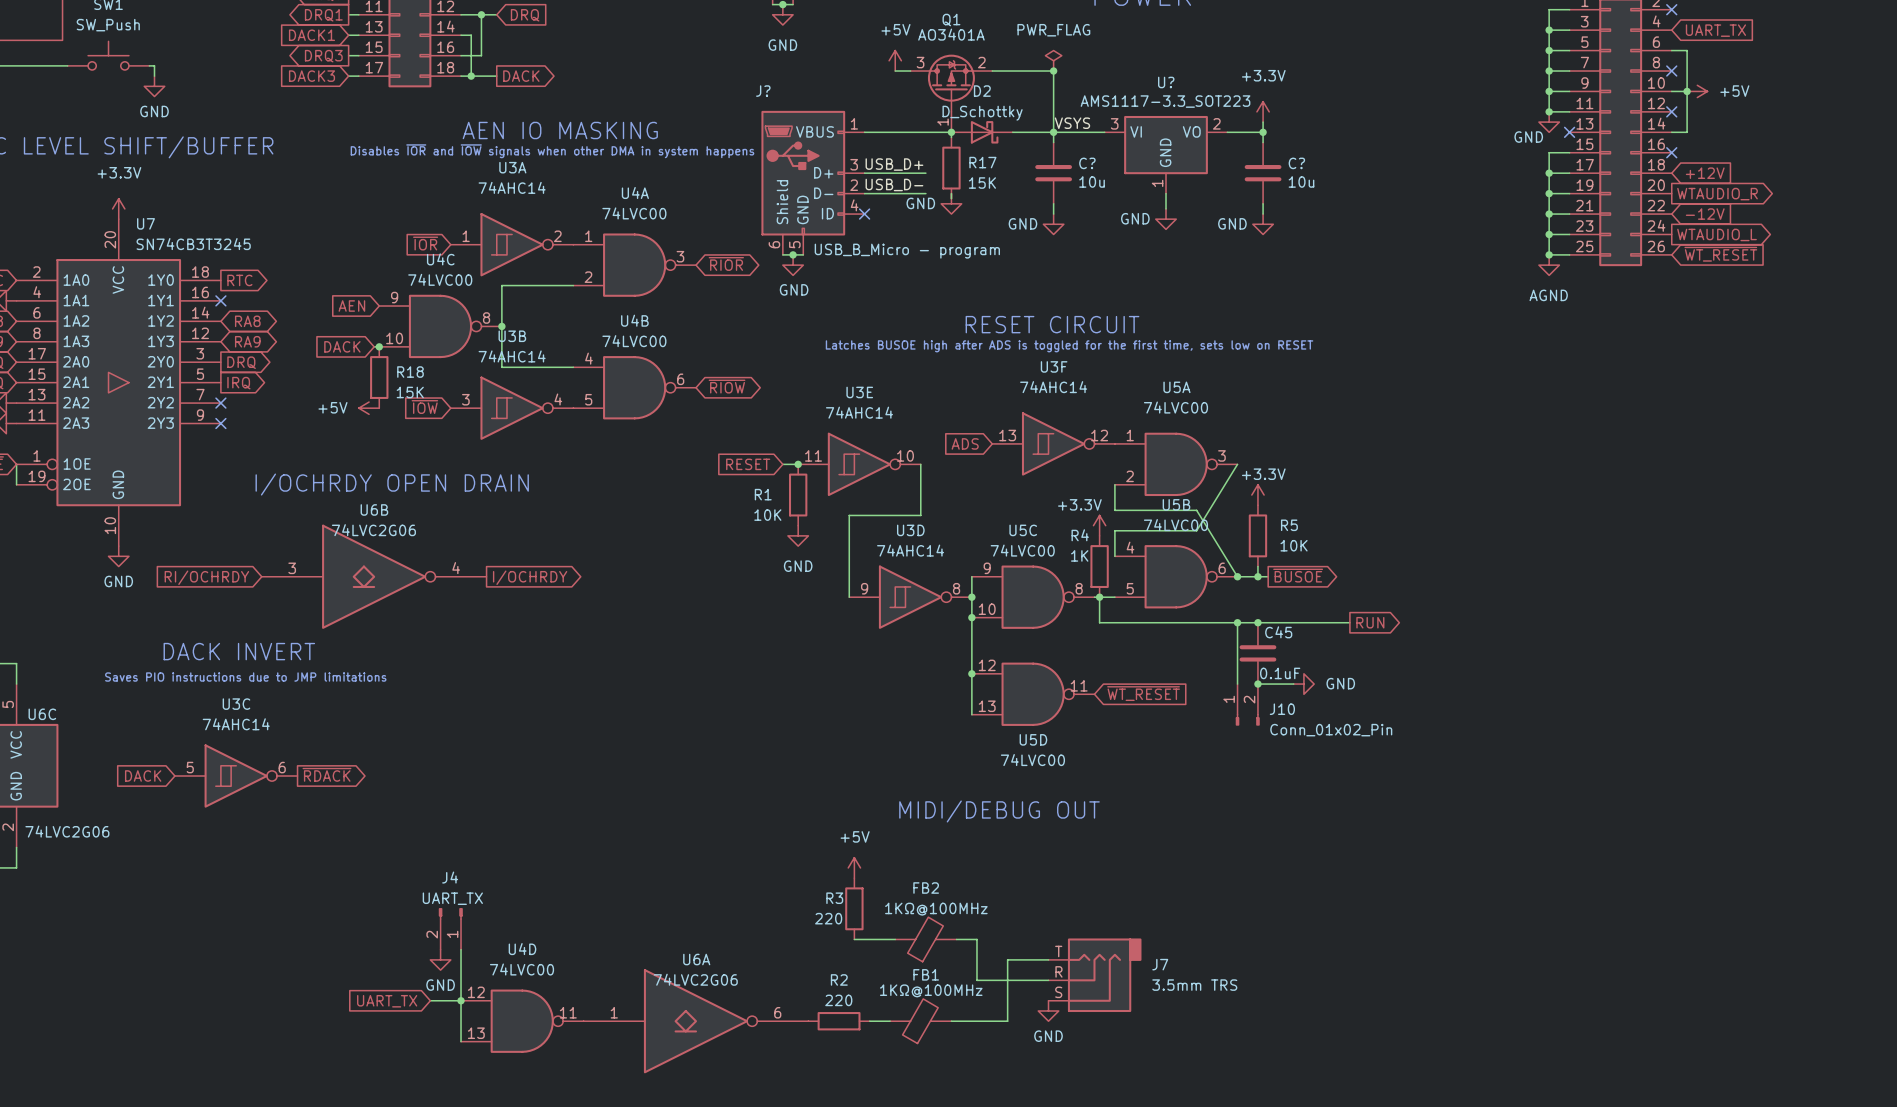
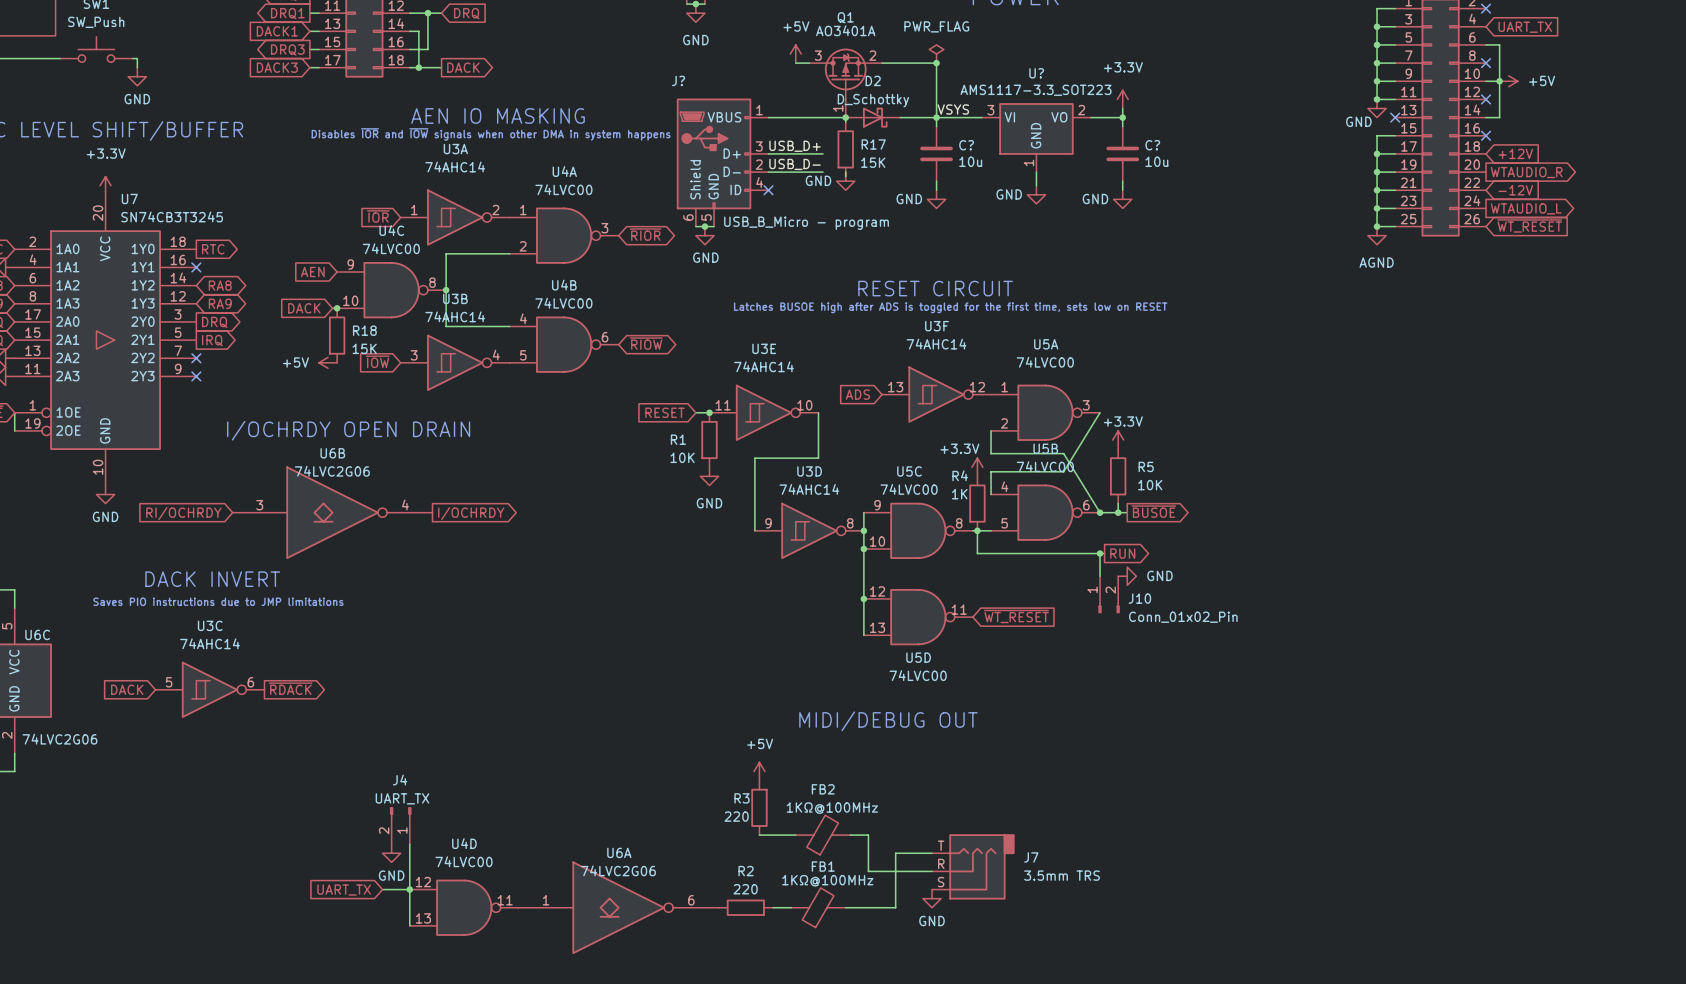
wire: (1242, 622) (1349, 622) -> none
junction: (1257, 622) -> none
global label position: RUN (1370, 622) -> RUN (1122, 553)
C45: 0.1uF (1257, 653) -> none
wire: (1257, 684) (1293, 684) -> none
junction: (1257, 684) -> none
power symbol position: GND (1303, 684) -> GND (1127, 576)
J10 position: (1247, 704) -> (1109, 594)

